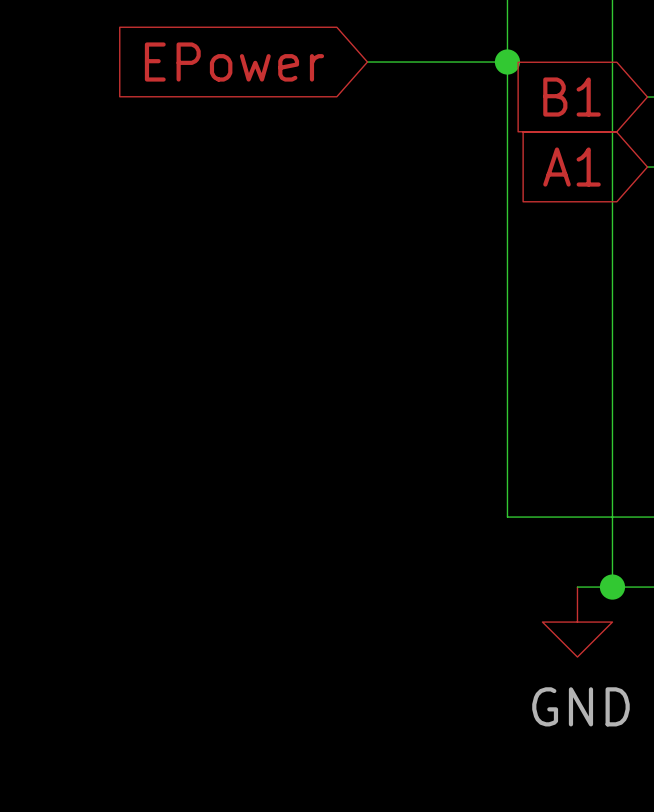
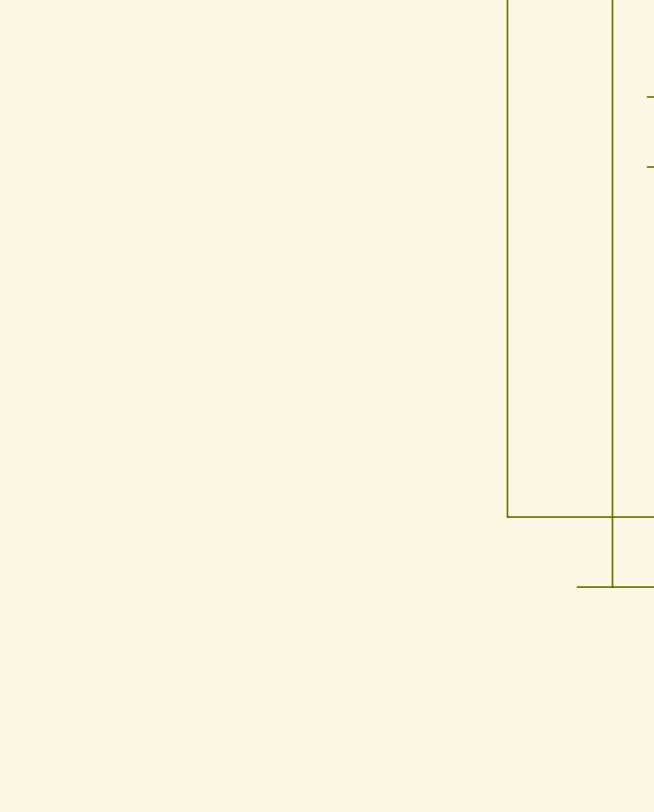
global label: EPower (234, 62) -> none
wire: (367, 62) (507, 62) -> none
junction: (507, 62) -> none
global label: B1 (572, 97) -> none
global label: A1 (572, 167) -> none
junction: (612, 587) -> none
power symbol: GND (577, 622) -> none

